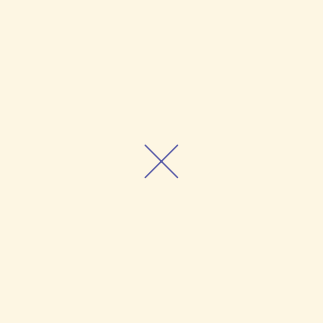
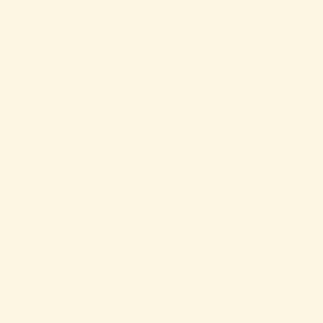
no-connect mark: (161, 161) -> none

